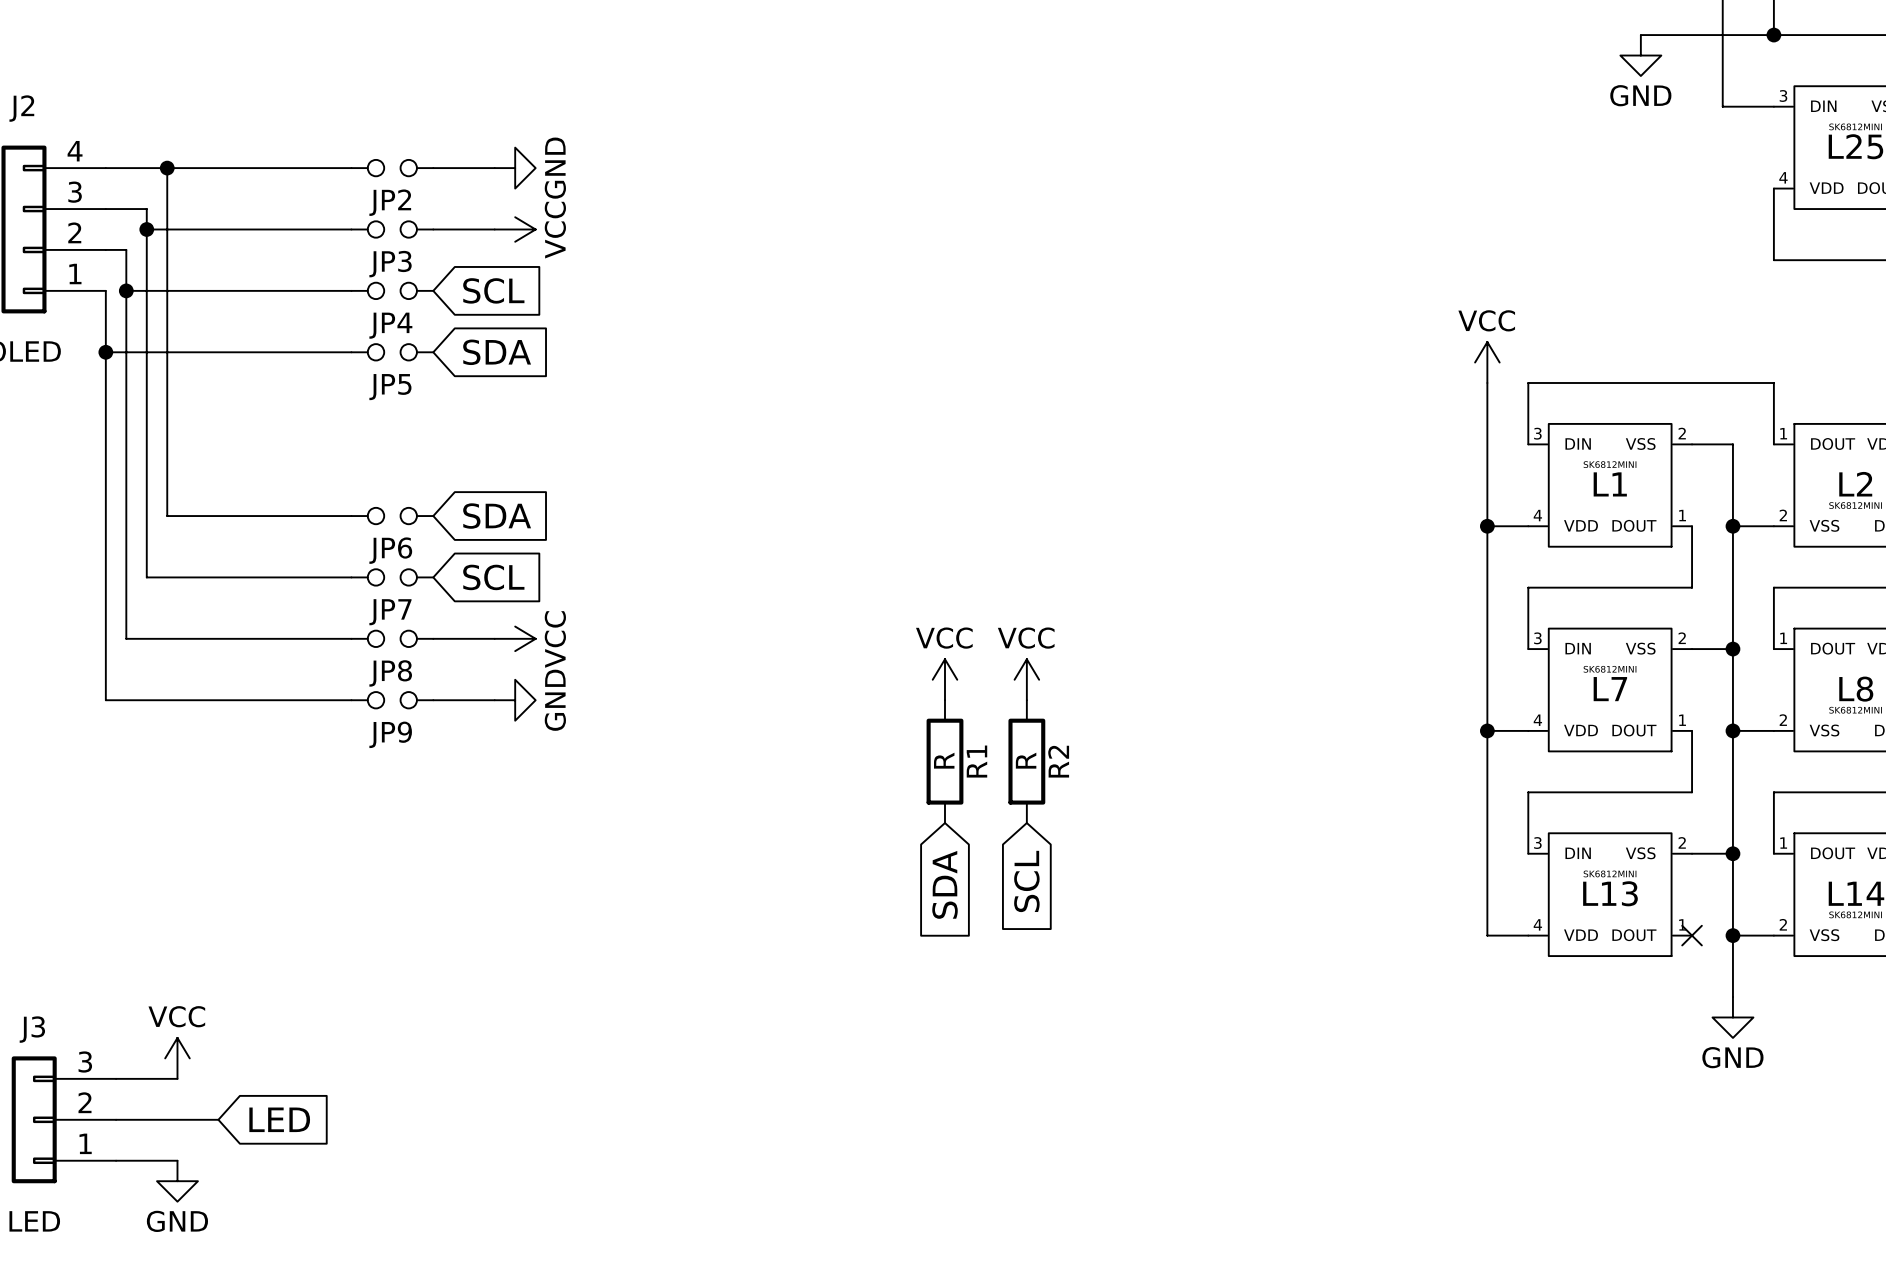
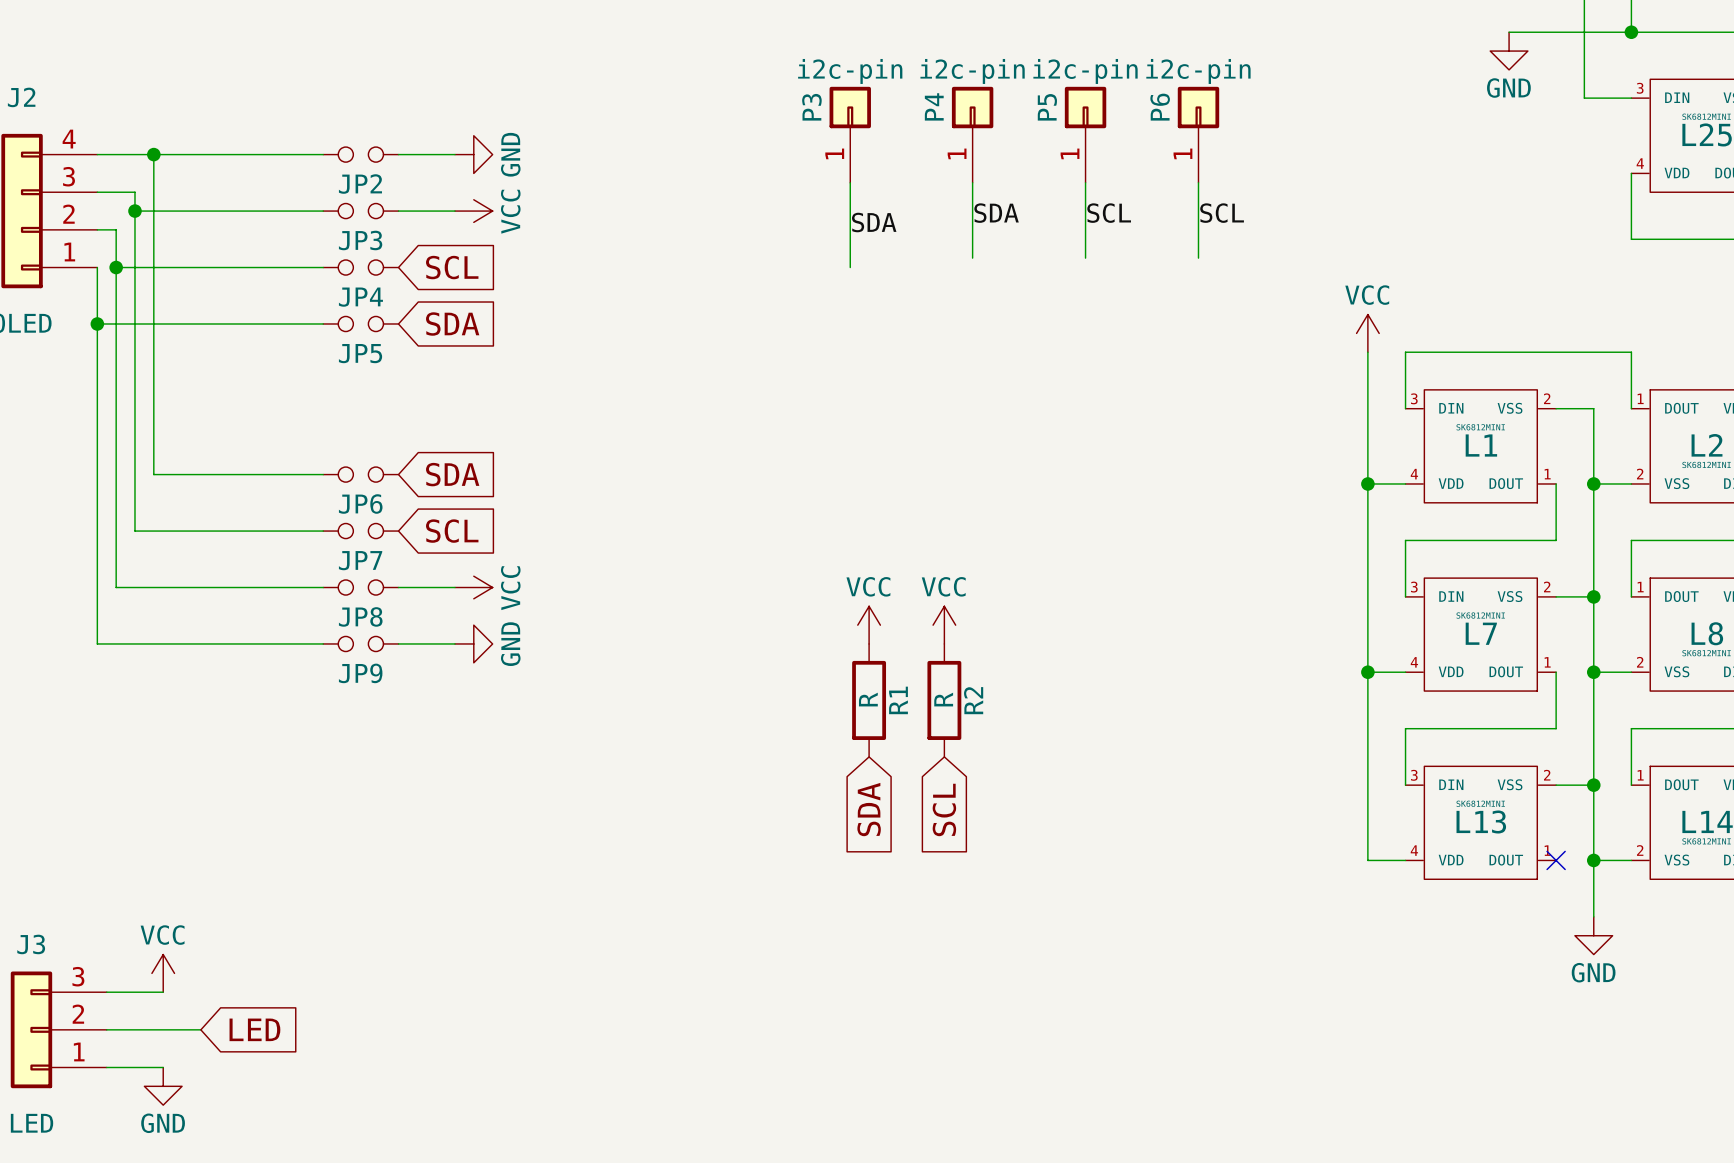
P3: none -> i2c-pin (850, 134)
P4: none -> i2c-pin (972, 134)
P5: none -> i2c-pin (1085, 134)
P6: none -> i2c-pin (1198, 134)
wire: none -> (850, 182) (850, 267)
wire: none -> (972, 182) (972, 258)
wire: none -> (1085, 182) (1085, 258)
wire: none -> (1198, 182) (1198, 258)
label: none -> SDA (996, 213)
label: none -> SCL (1109, 213)
label: none -> SCL (1222, 213)
label: none -> SDA (874, 222)

